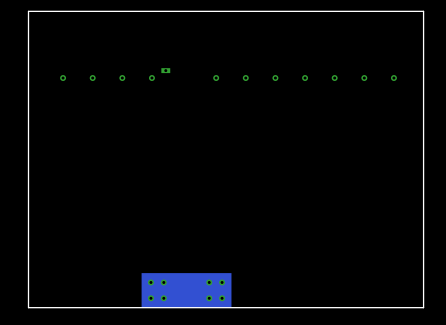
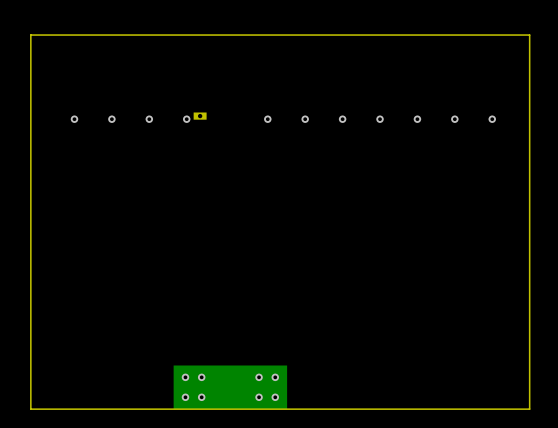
part footprint: [161, 68, 171, 74] -> [193, 112, 207, 120]

